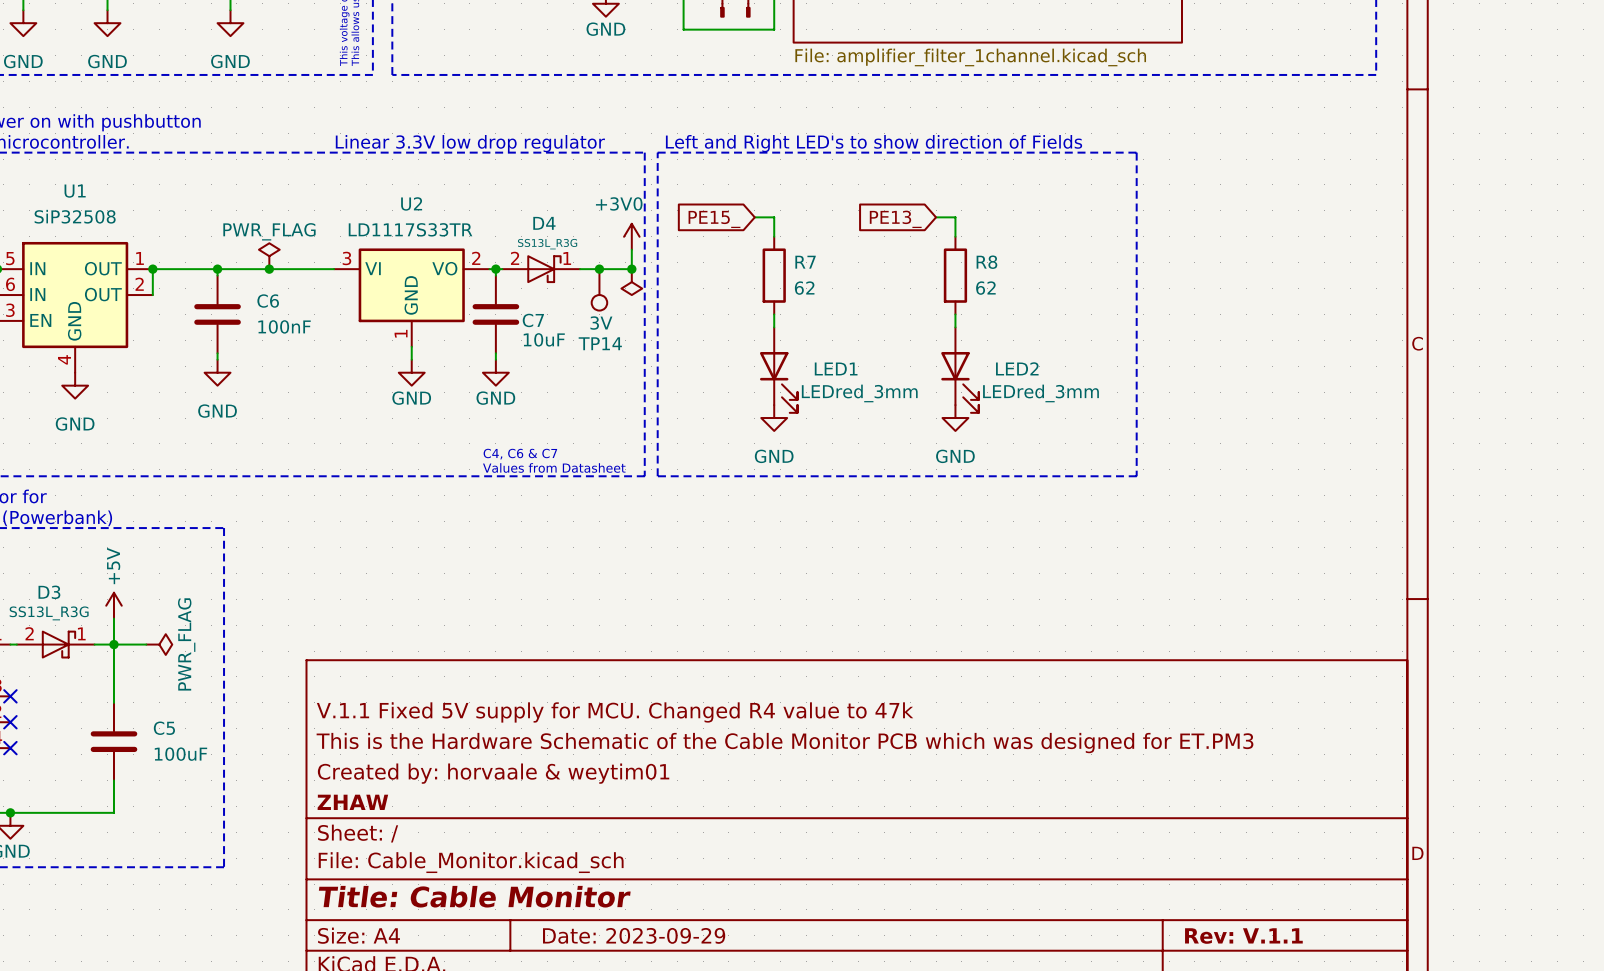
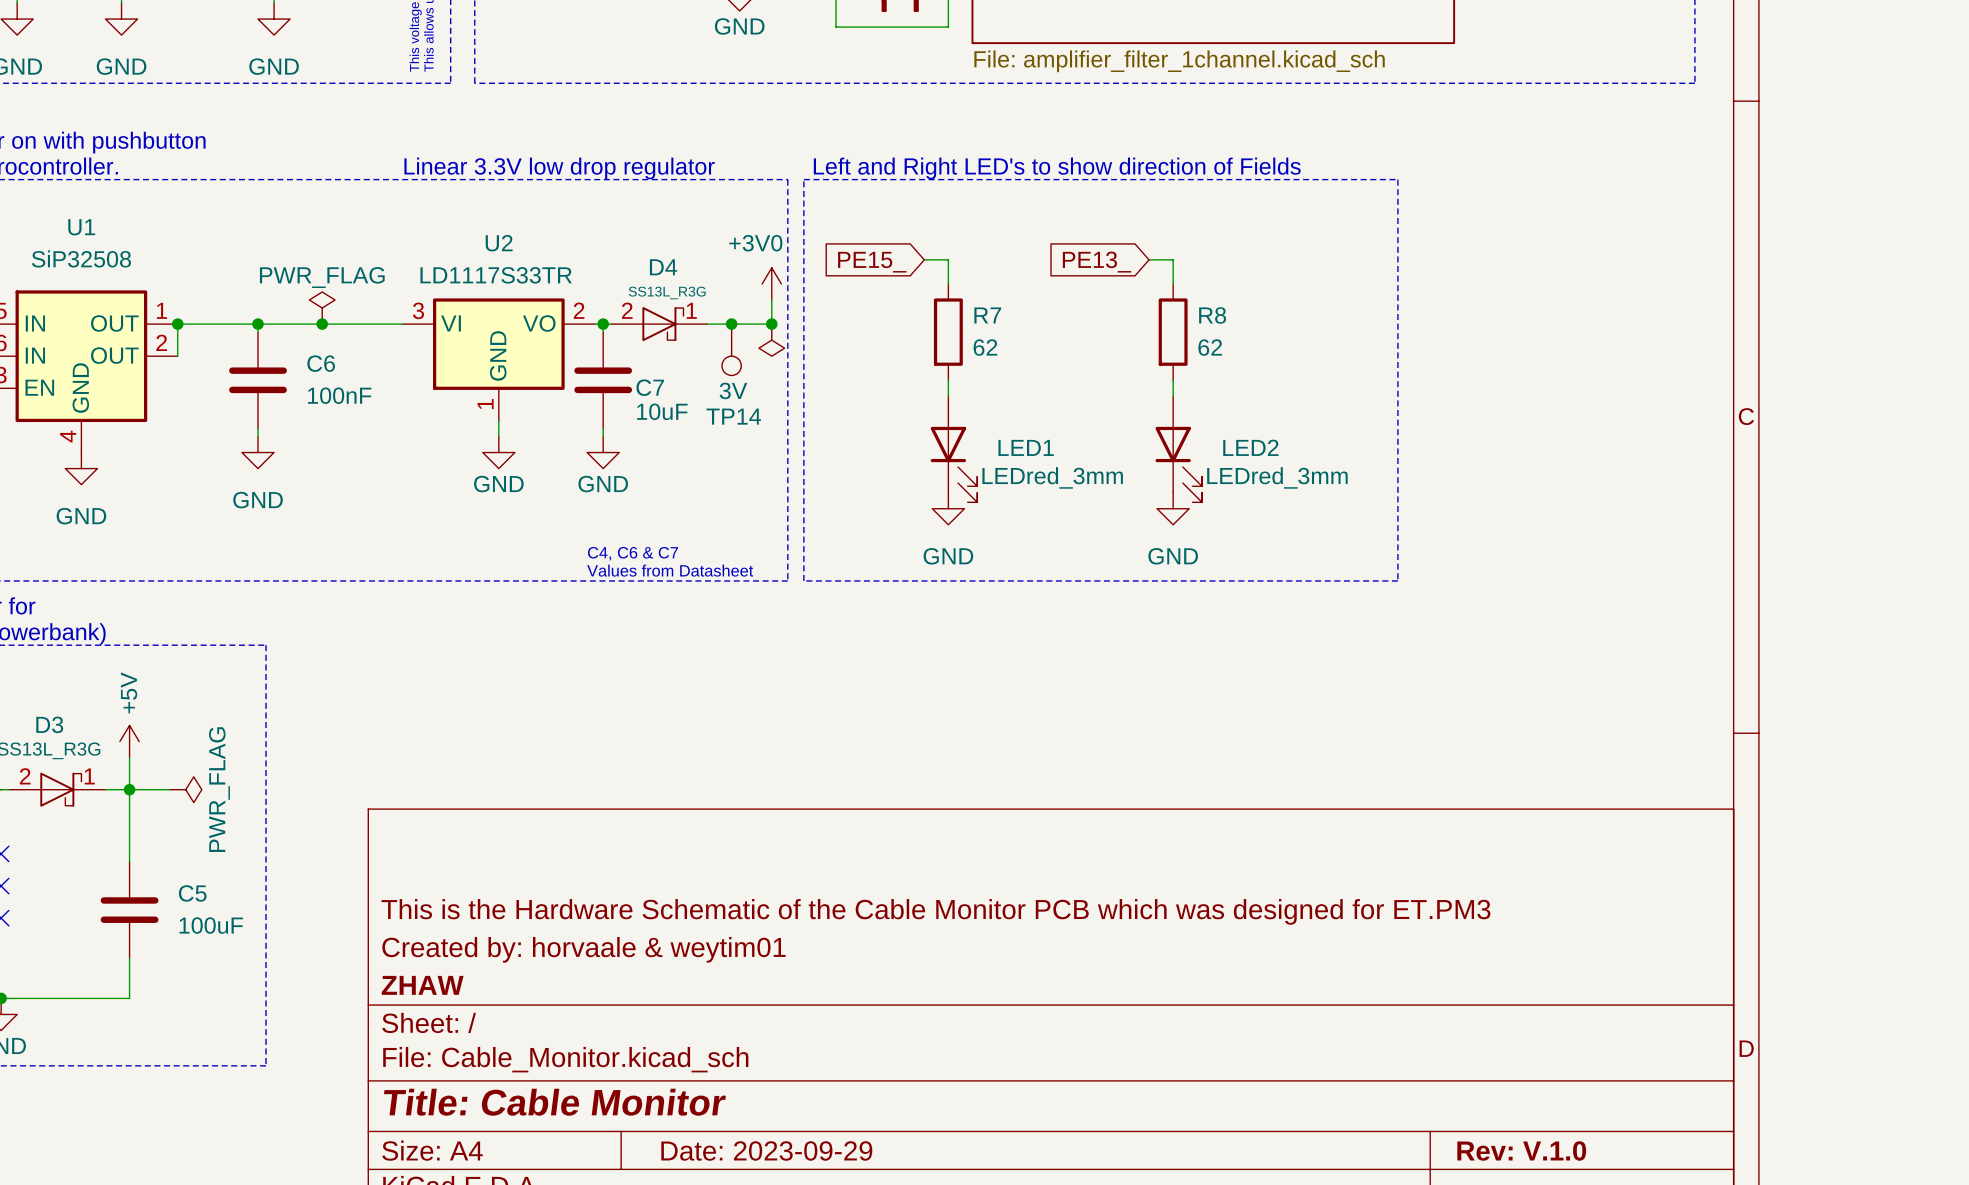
title block: V.1.1 Fixed 5V supply for MCU. Changed R4 value to 47k (615, 712) -> none
title block: Rev: V.1.1 (1243, 936) -> Rev: V.1.0 (1521, 1150)

